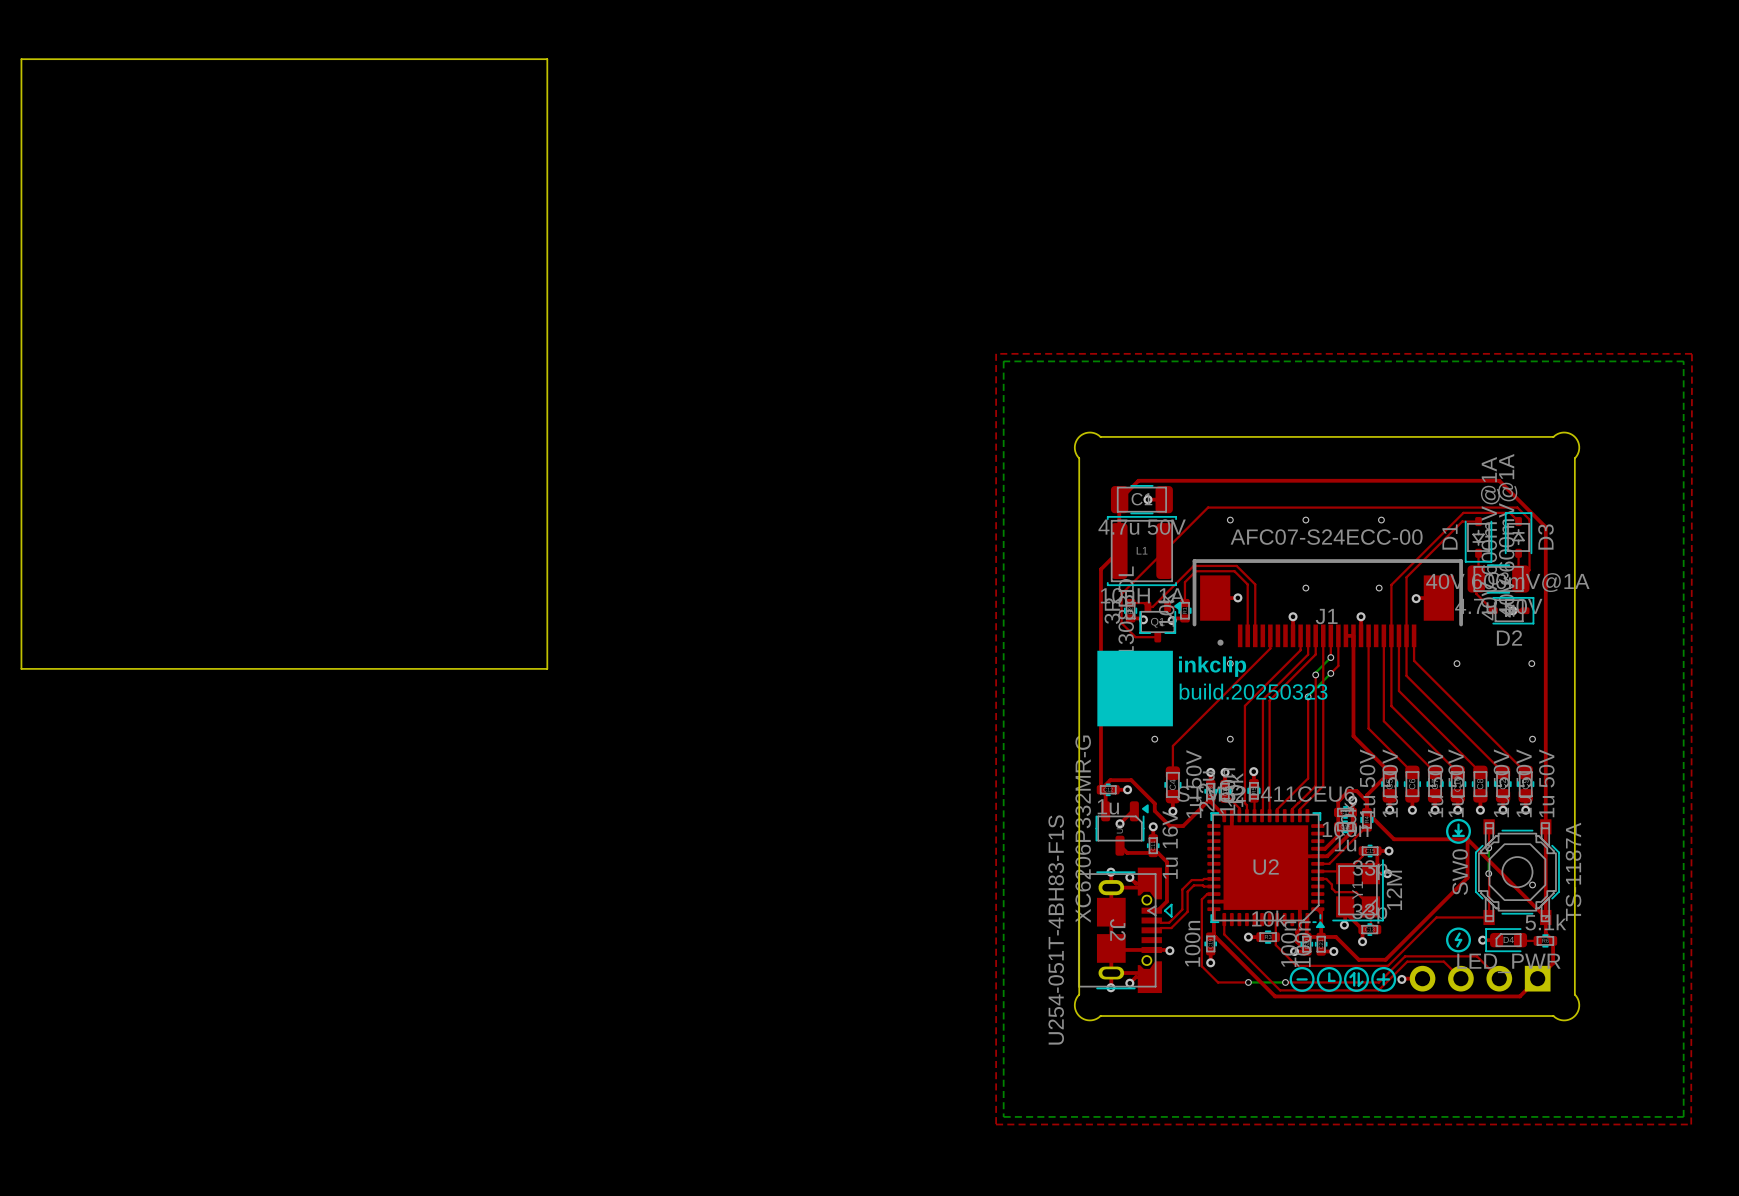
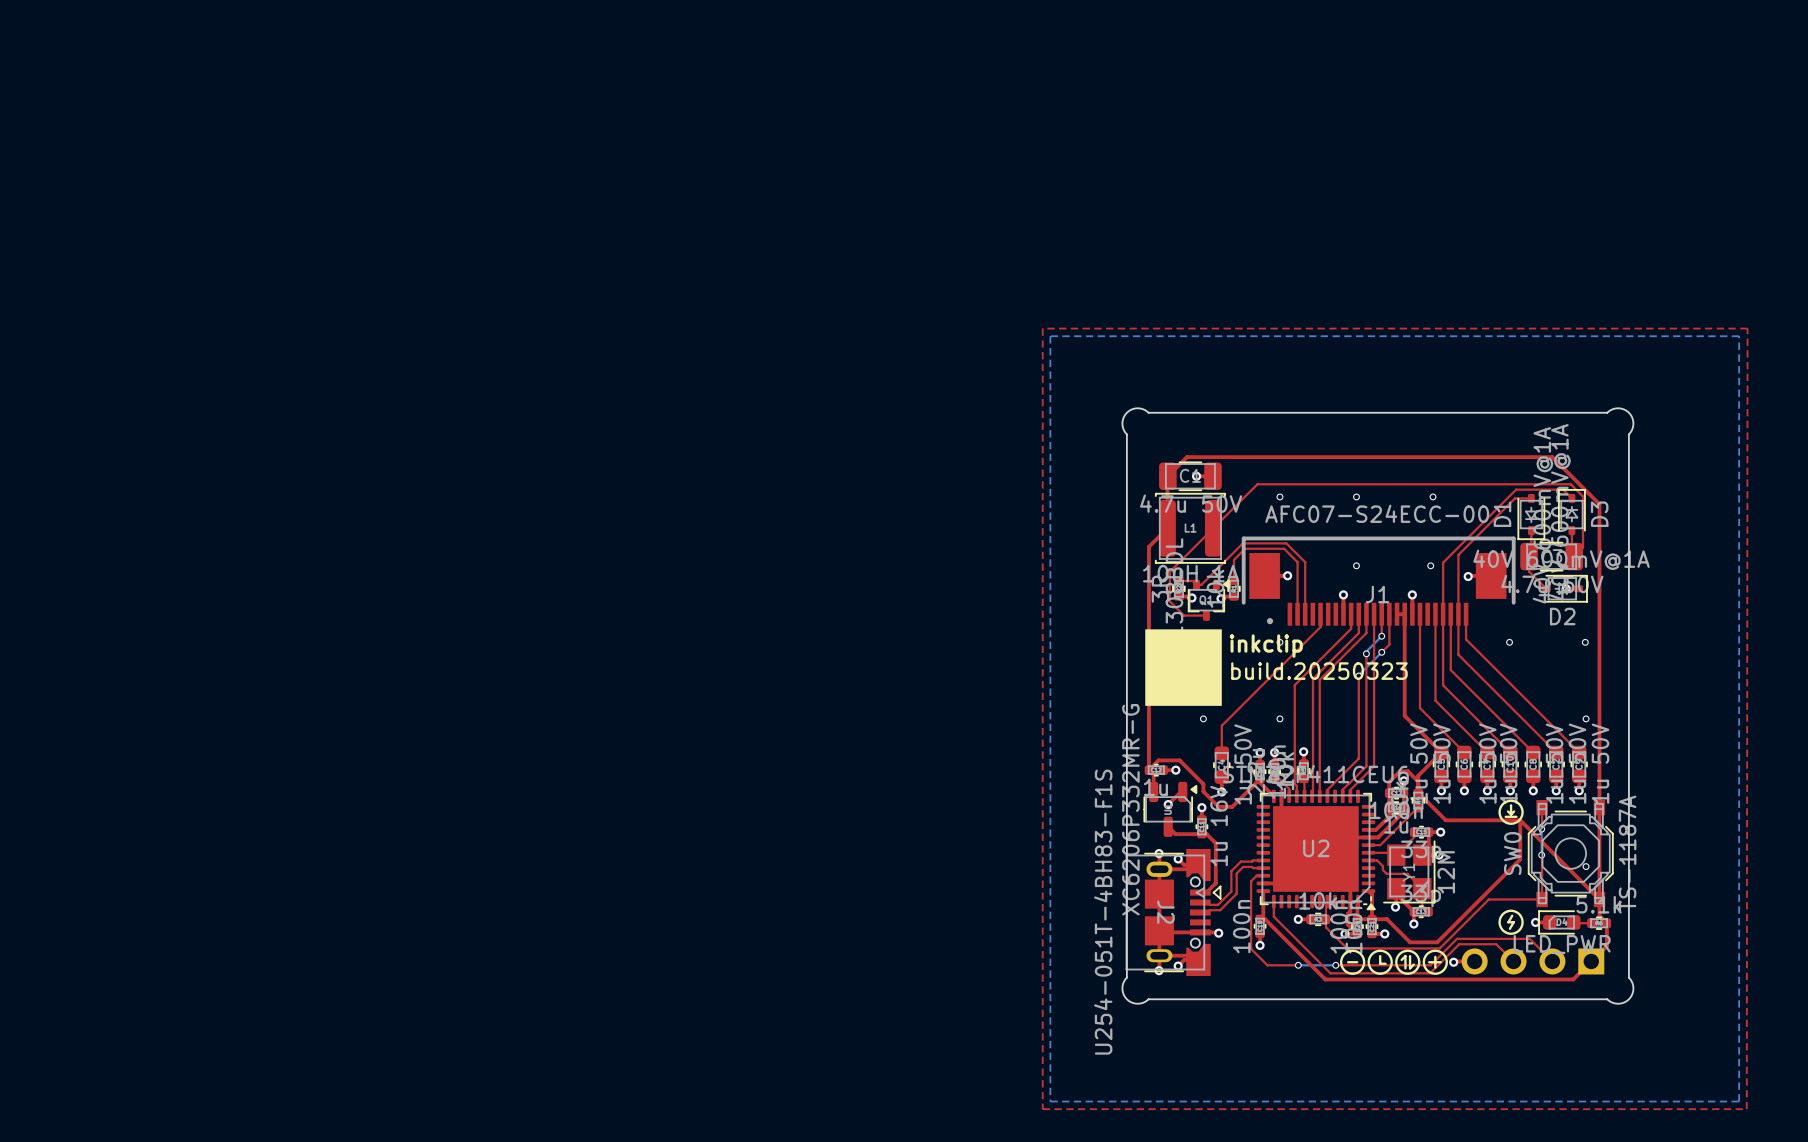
board edge: (21, 59) (547, 59) (547, 668) (21, 668) (21, 59) -> none

